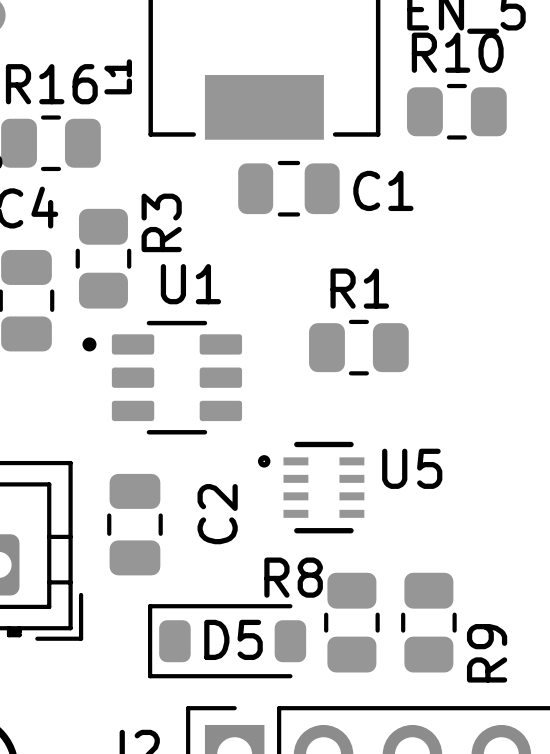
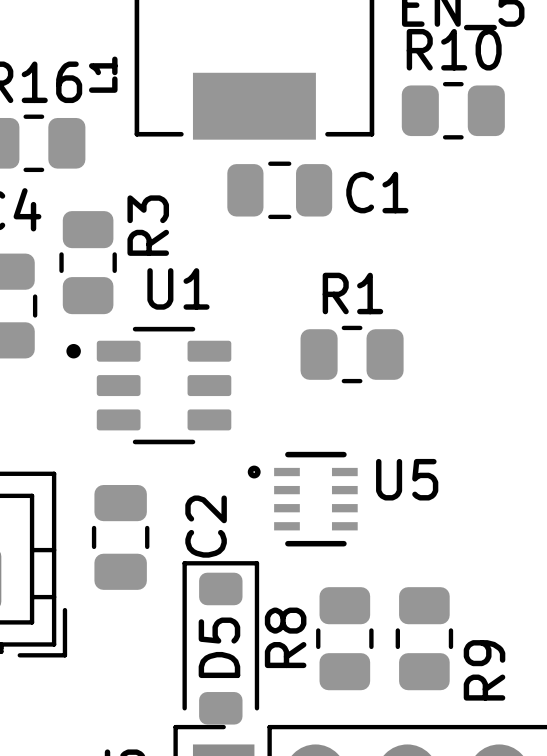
R8 name rotation: 0° (293, 577) -> 90° counterclockwise (285, 637)
D5 rotation: 0° (227, 641) -> 90° clockwise (220, 642)

